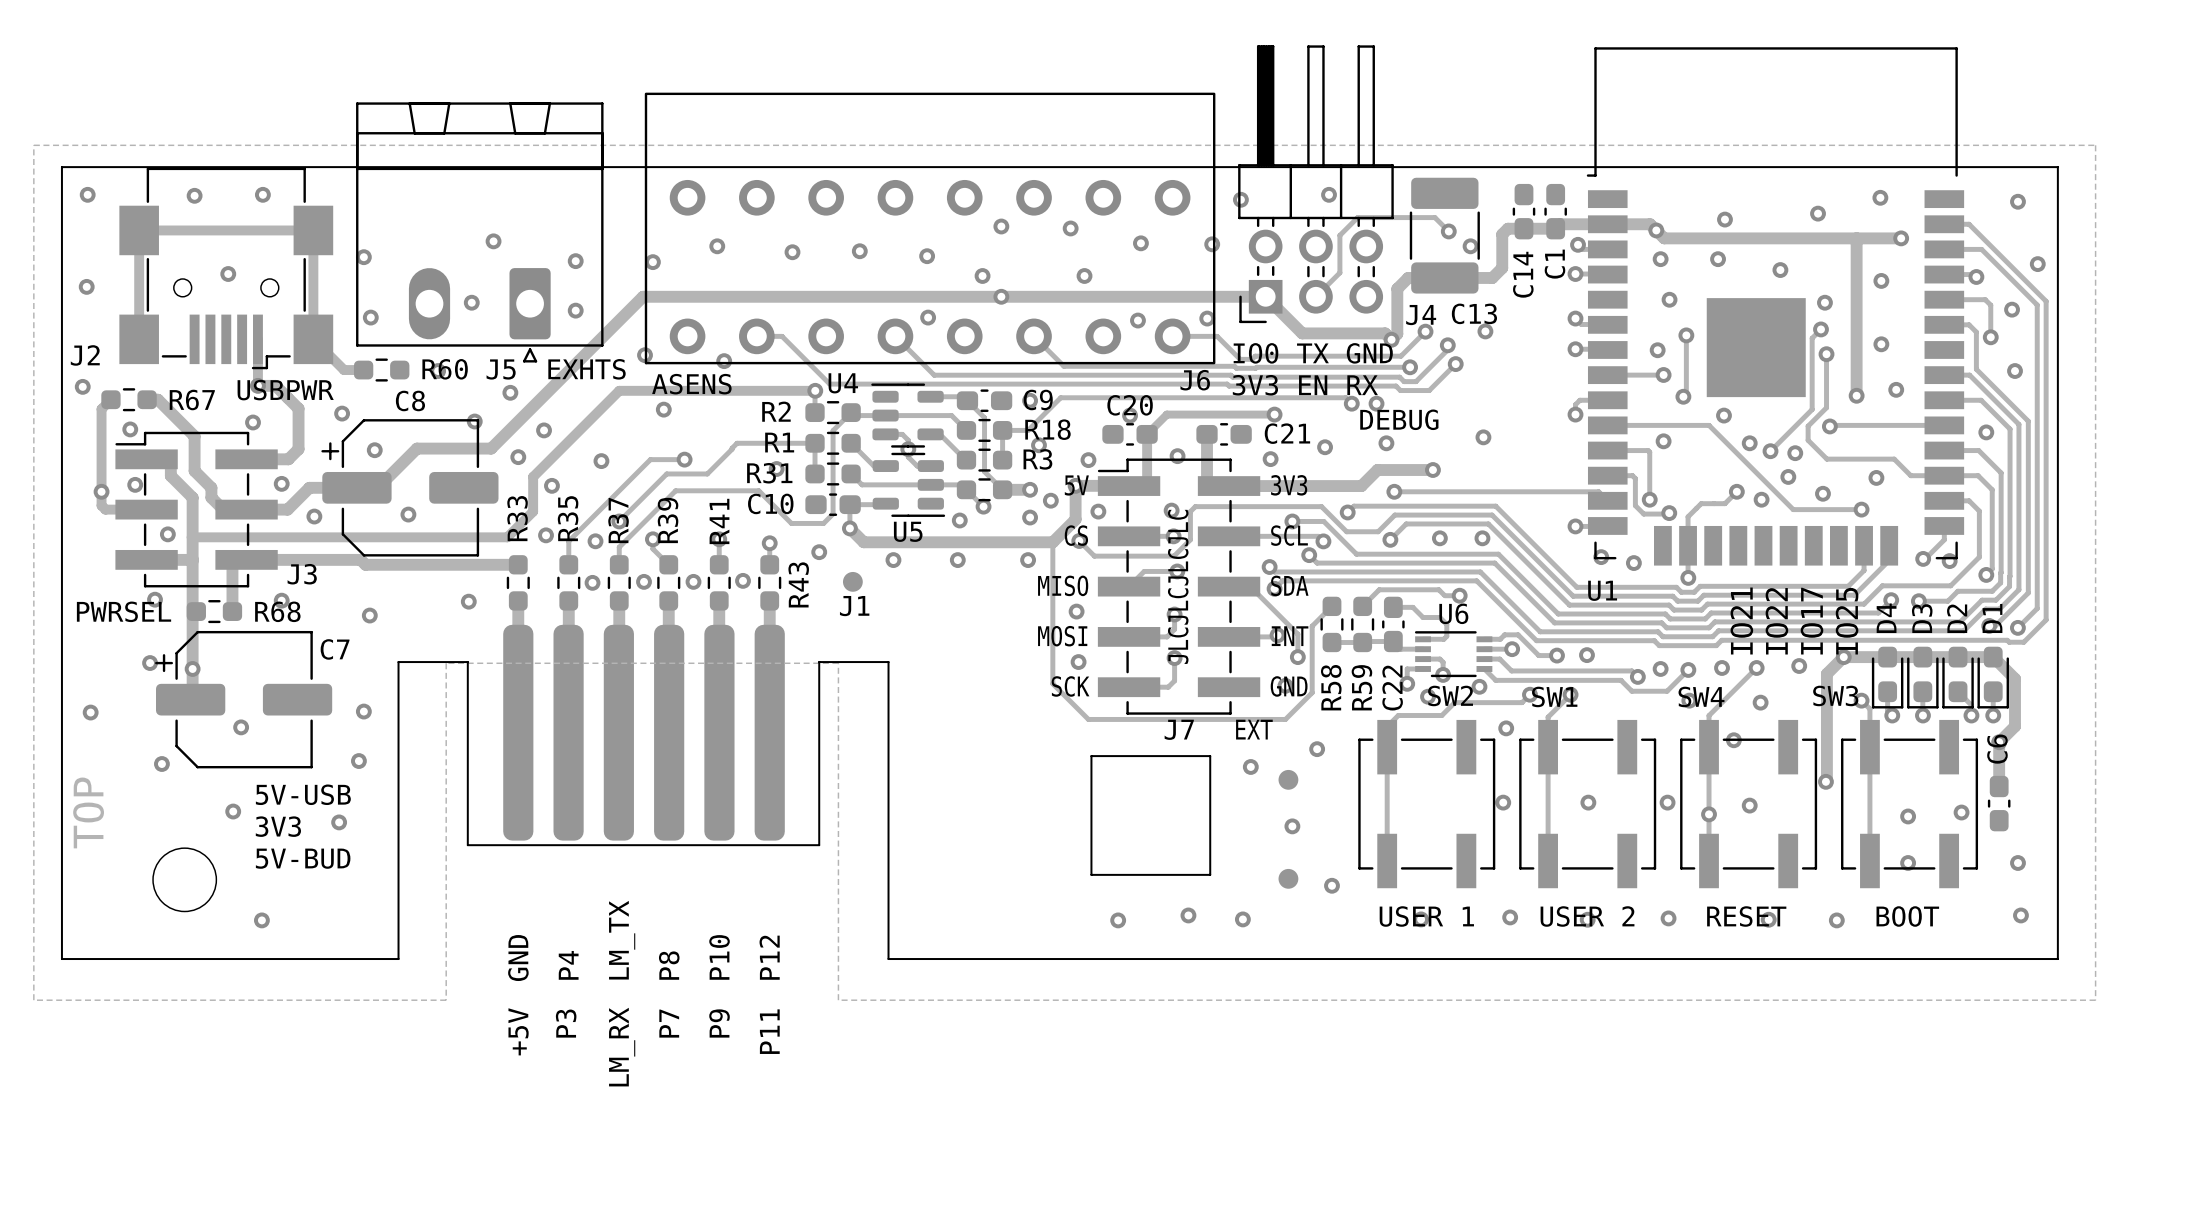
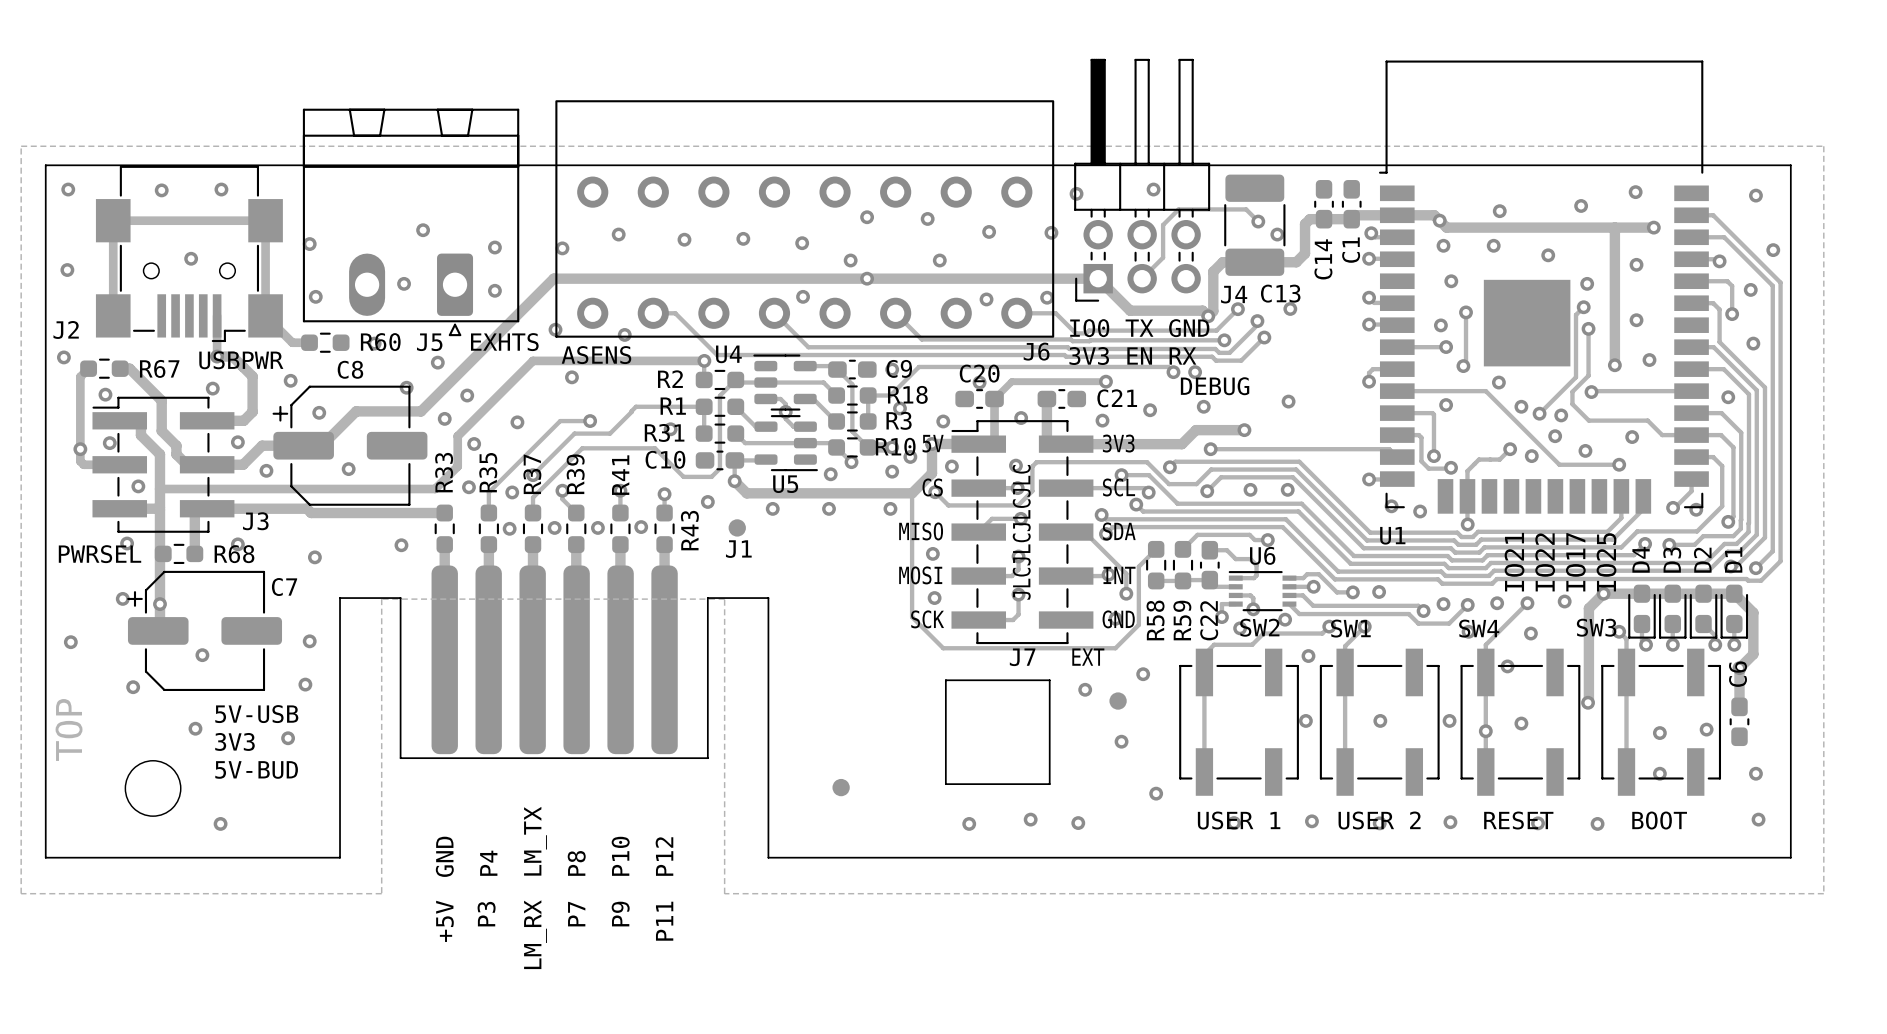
R10 name: none -> R10 (895, 446)
part position: (1288, 878) -> (841, 787)

